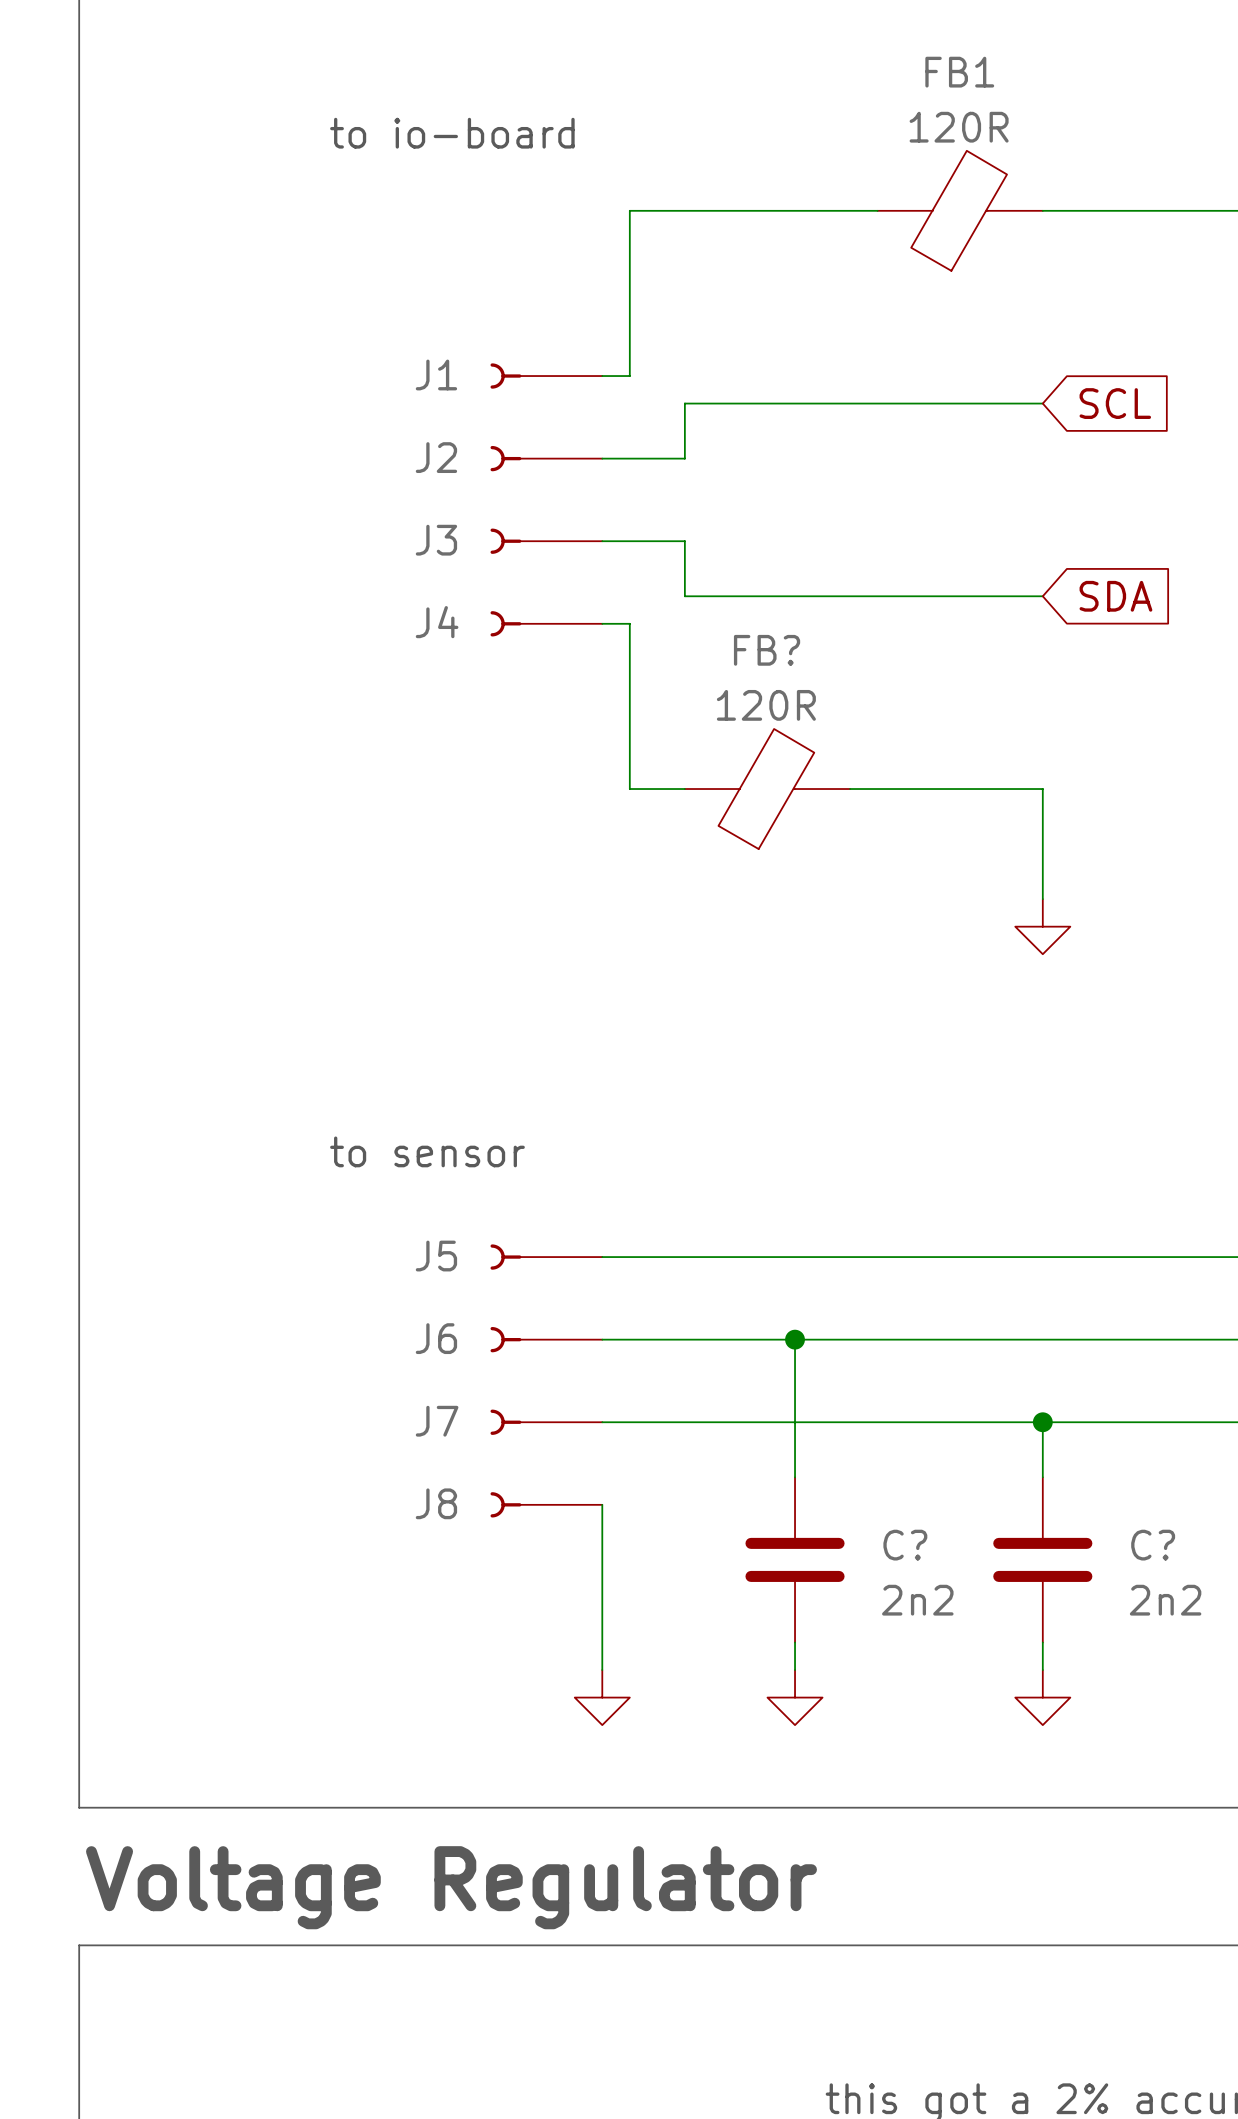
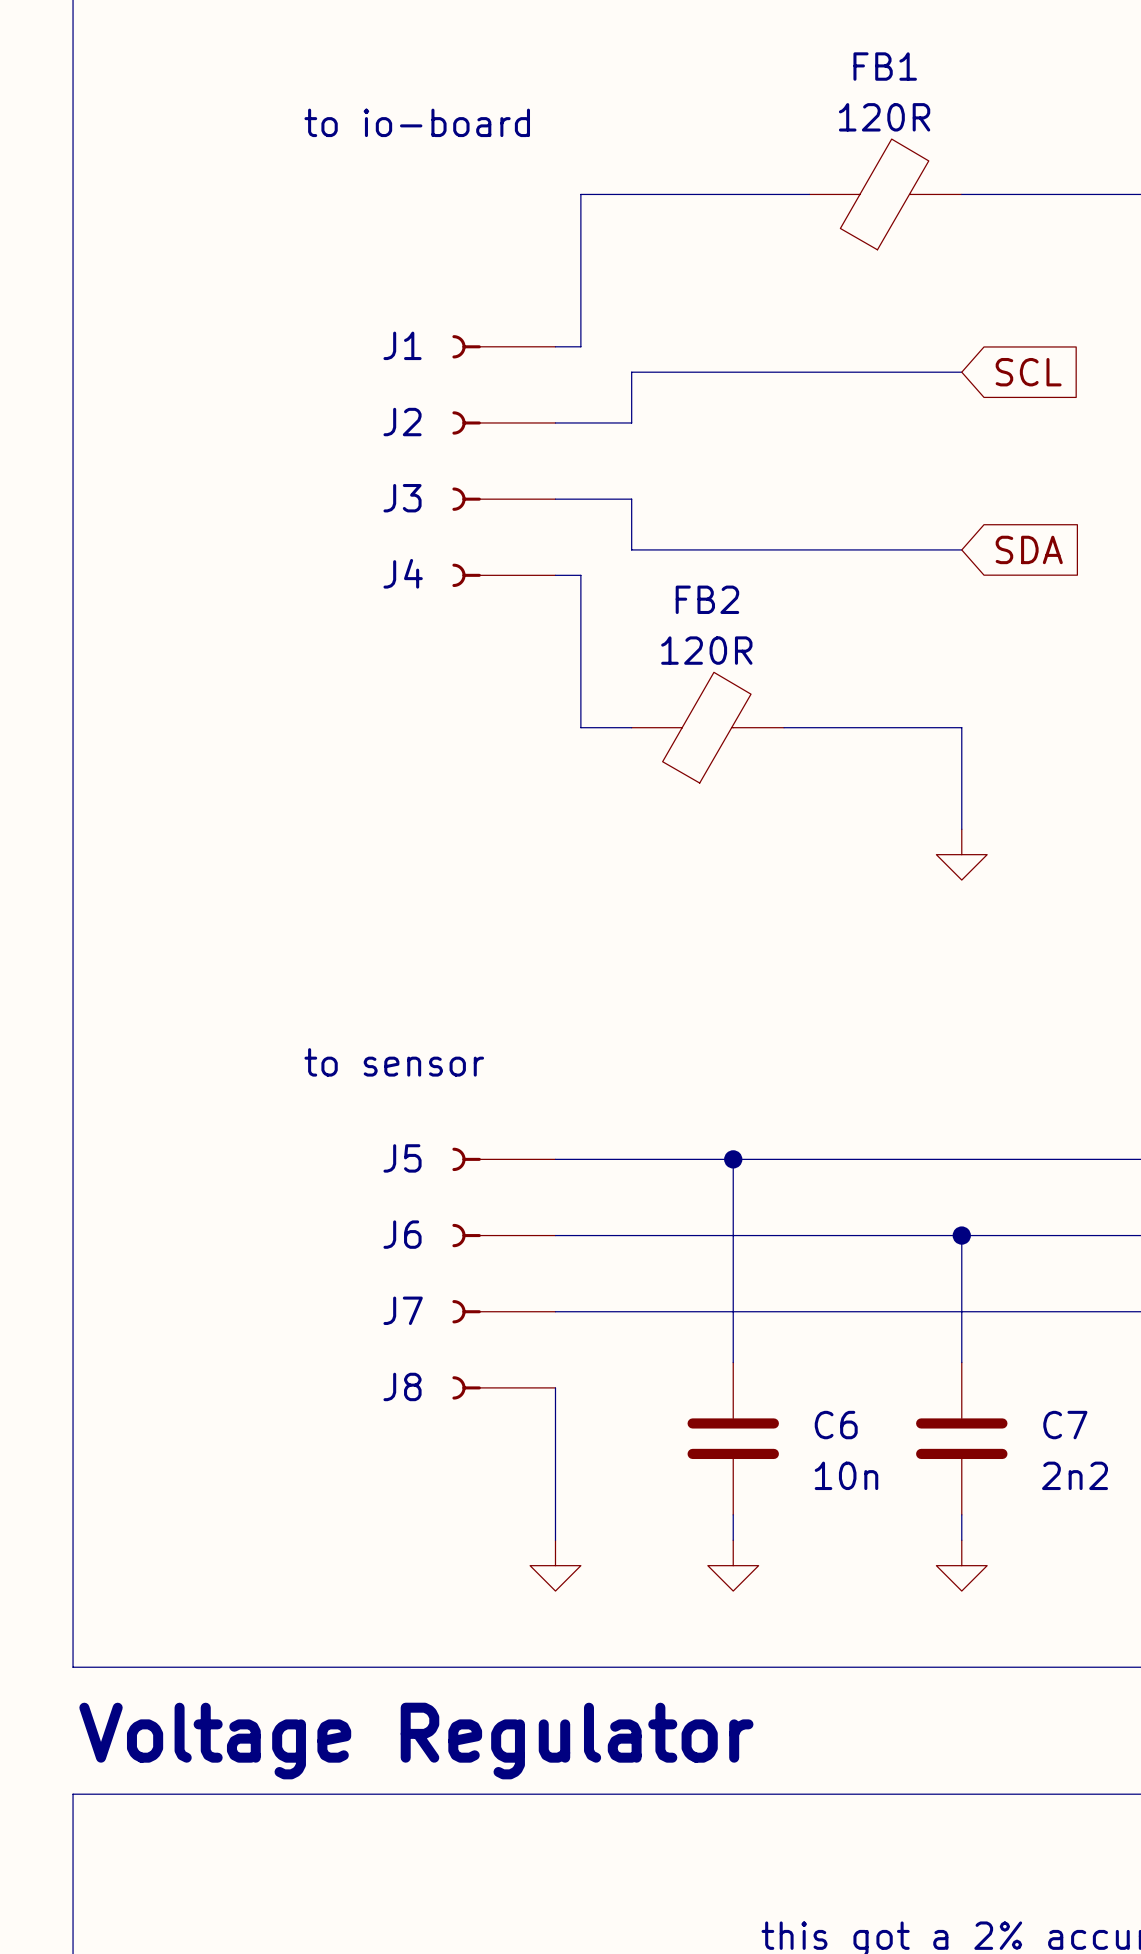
FB? name: FB? (767, 650) -> FB2 (707, 599)
wire: none -> (733, 1159) (733, 1235)
junction position: (795, 1339) -> (733, 1159)
wire: none -> (961, 1235) (961, 1311)
junction position: (1042, 1422) -> (961, 1235)
C? name: C? (905, 1545) -> C6 (836, 1425)
C? name: C? (1153, 1545) -> C7 (1065, 1425)
C? value: 2n2 (917, 1600) -> 10n (846, 1475)

